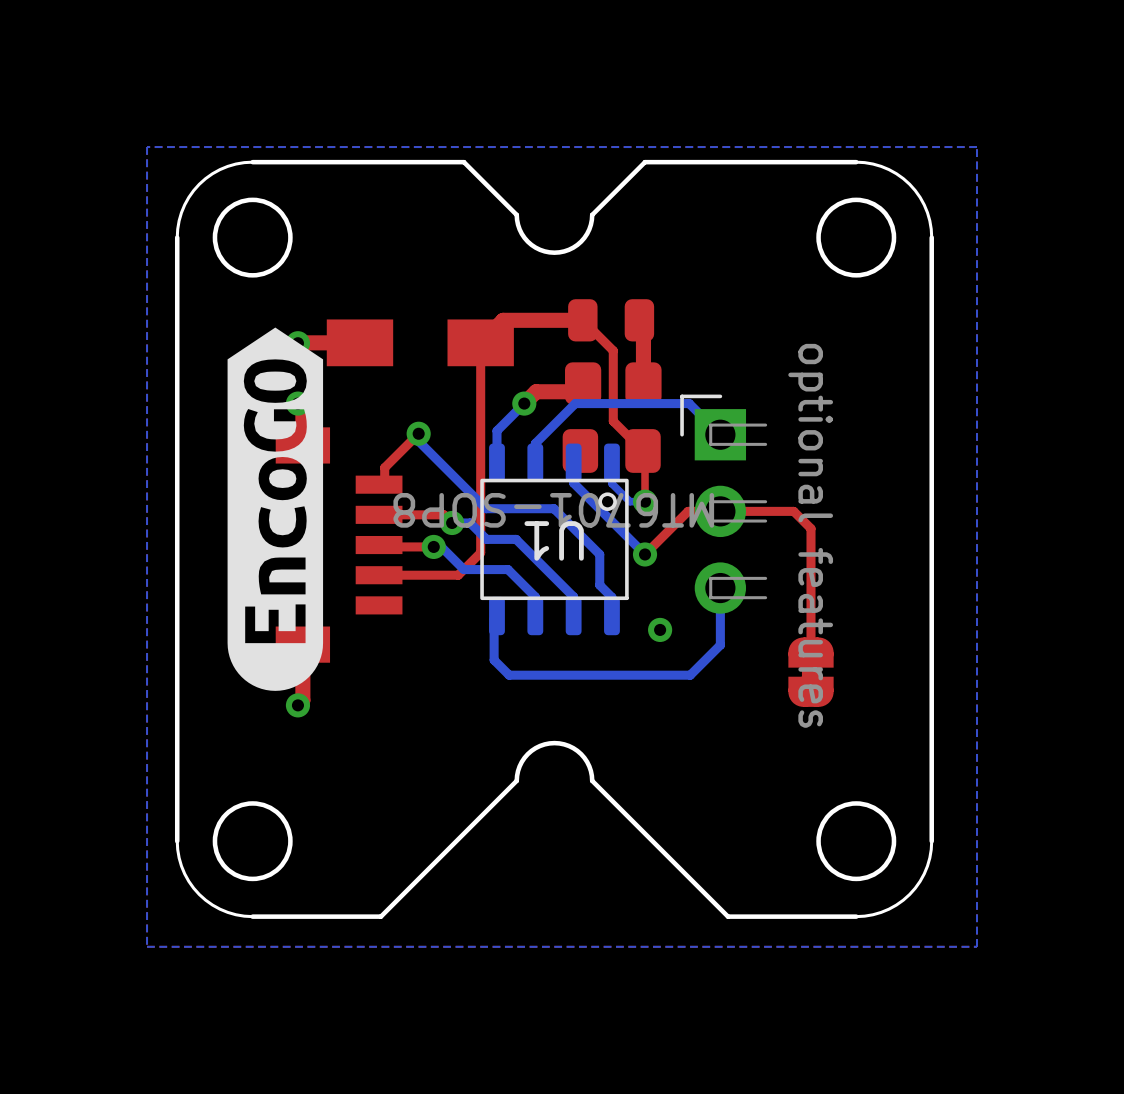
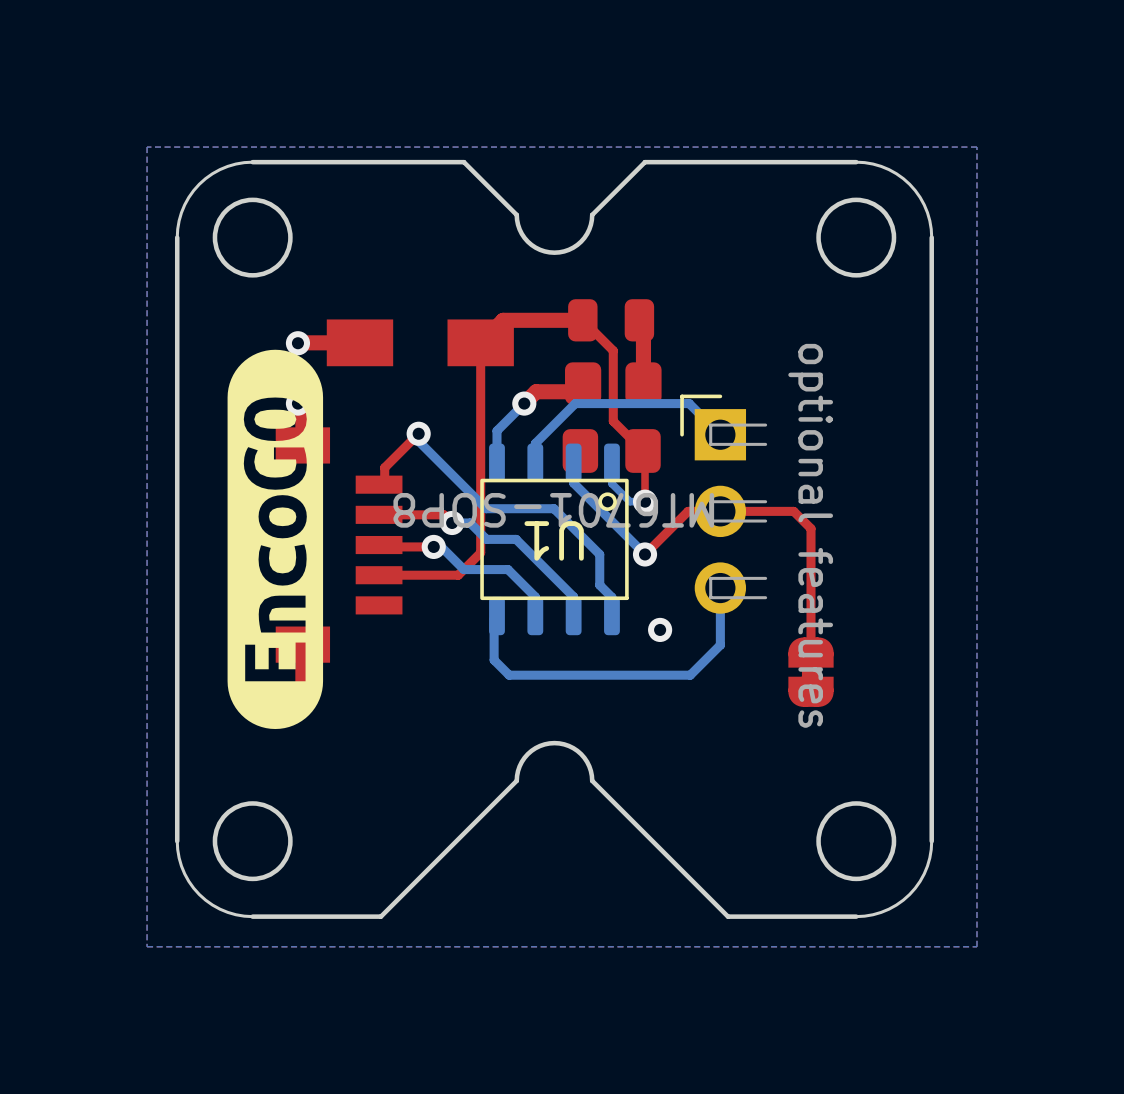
drawing shape: [227, 327, 324, 691] -> [227, 349, 324, 730]

